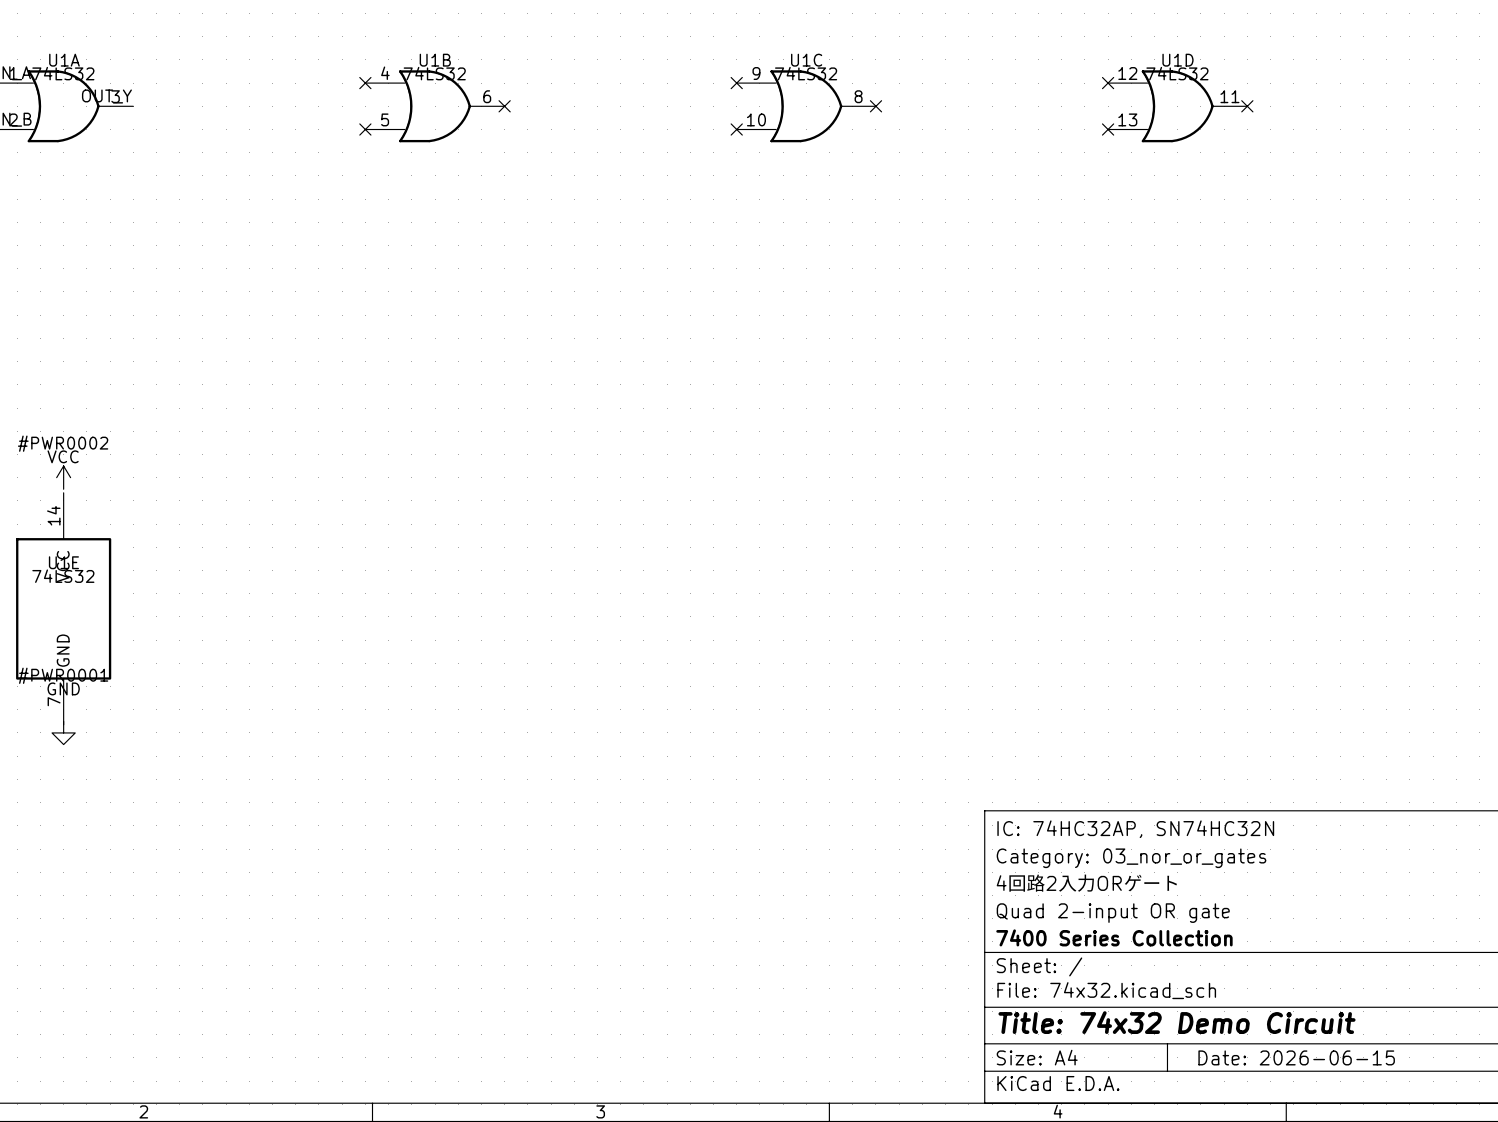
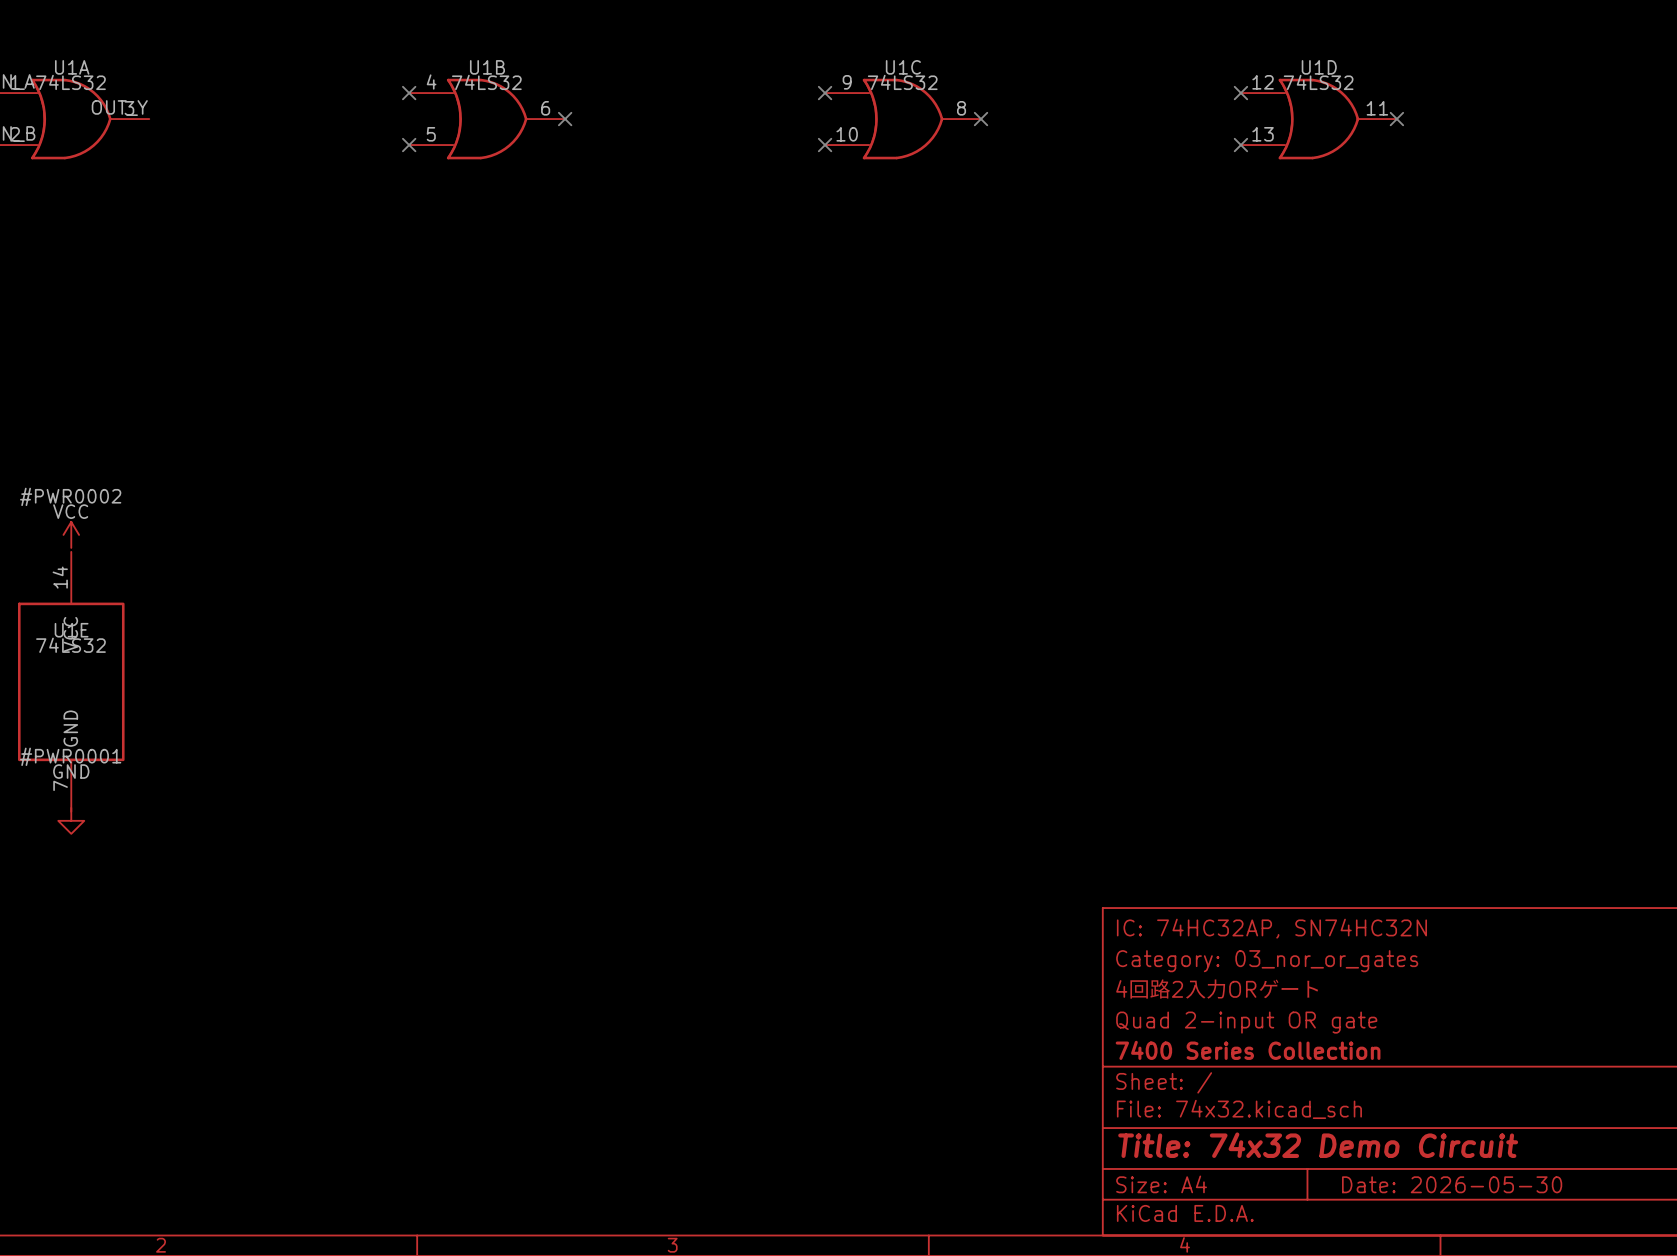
title block: Date: 2026-06-15 (1296, 1057) -> Date: 2026-05-30 (1452, 1184)

